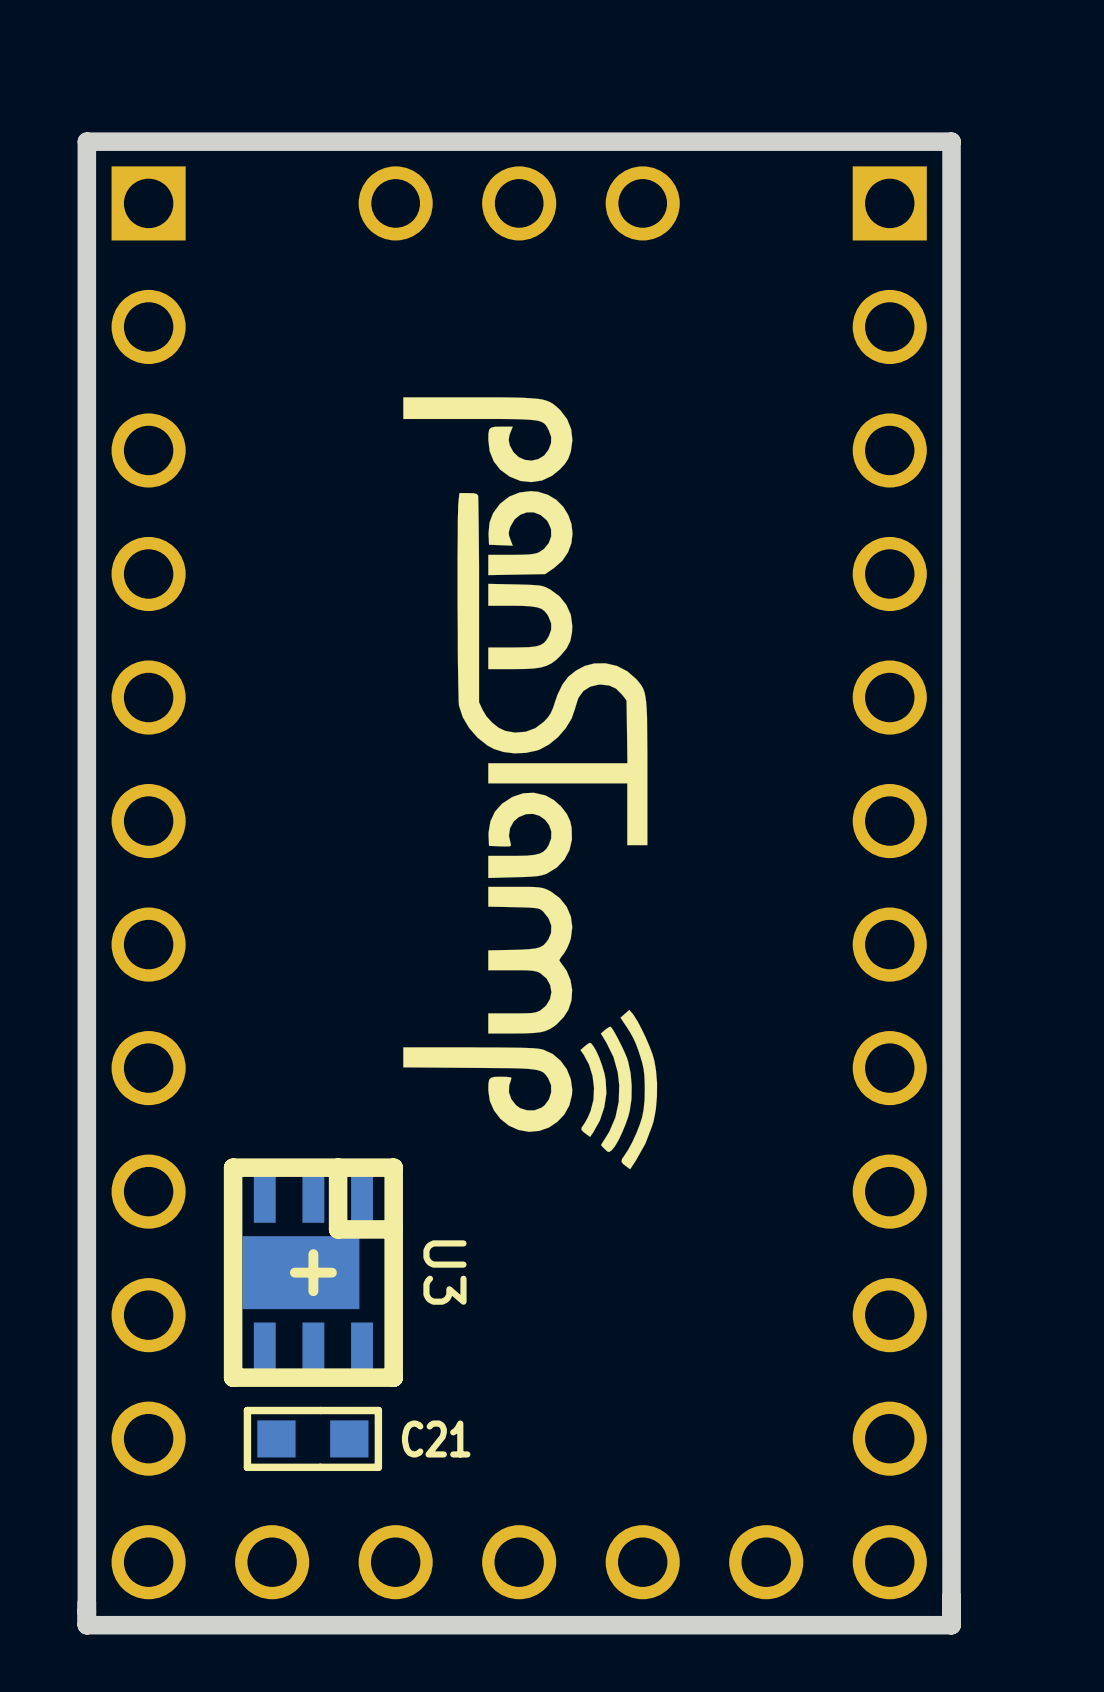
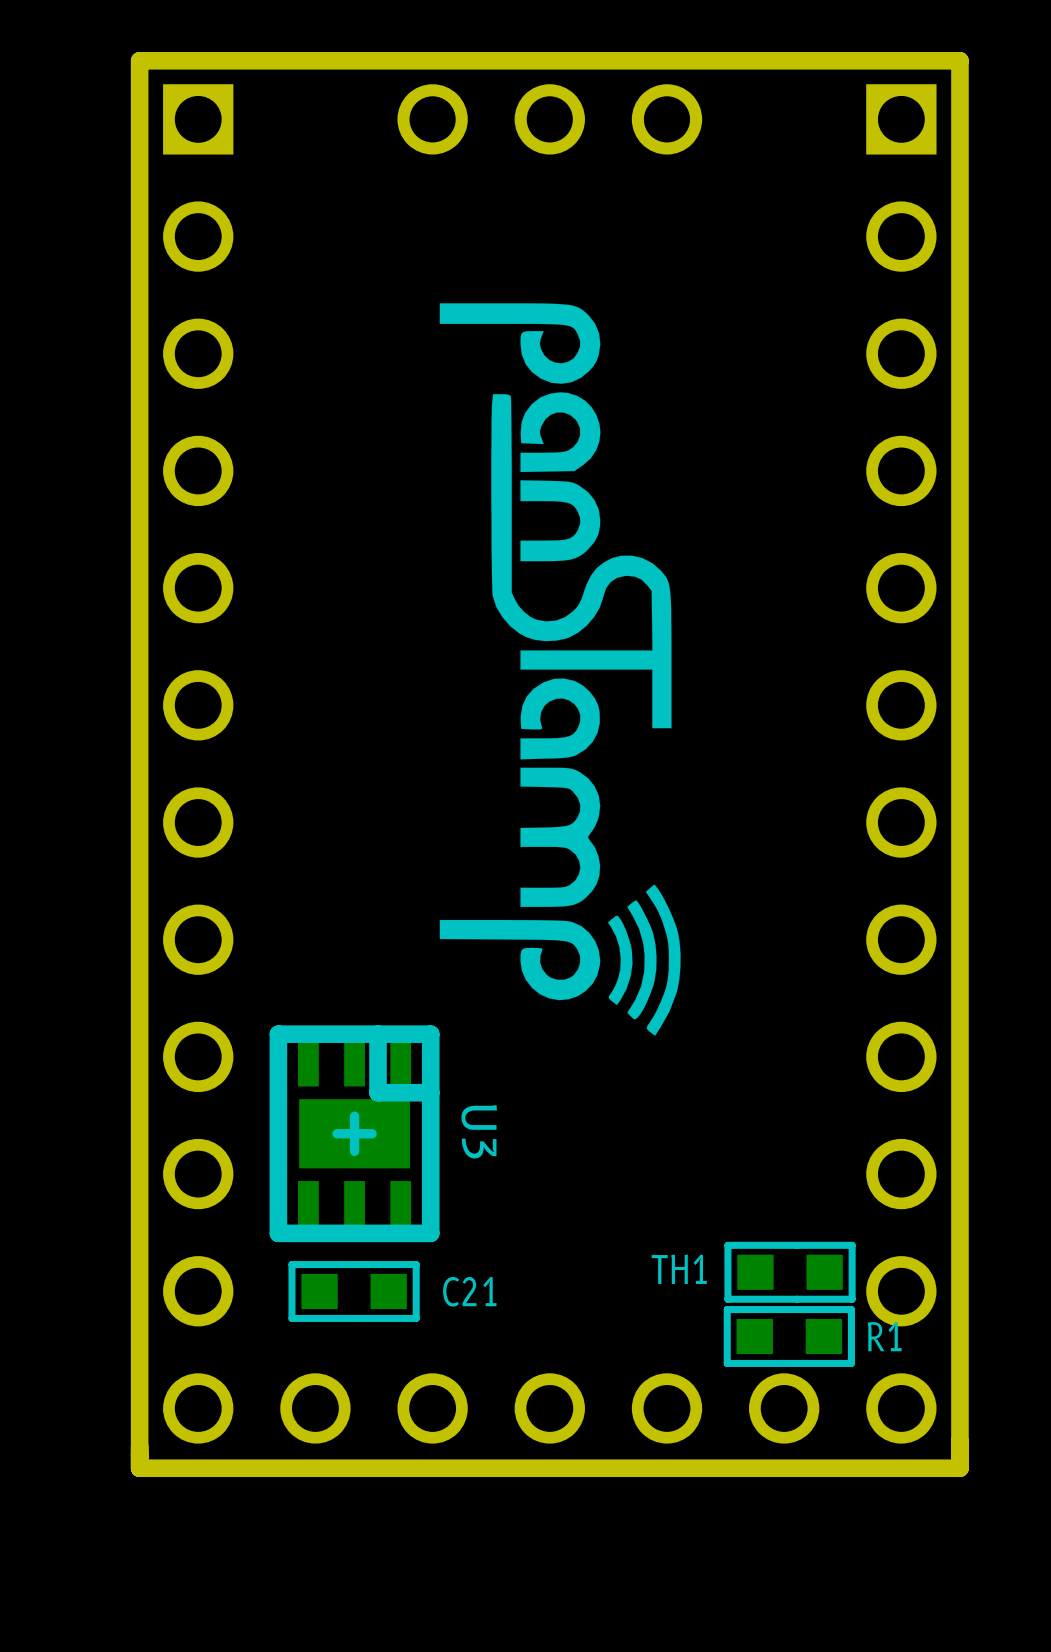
U3 footprint: [223, 1158, 403, 1387] -> [269, 1025, 440, 1243]
TH1: none -> (790, 1272)
R1: none -> (789, 1336)

